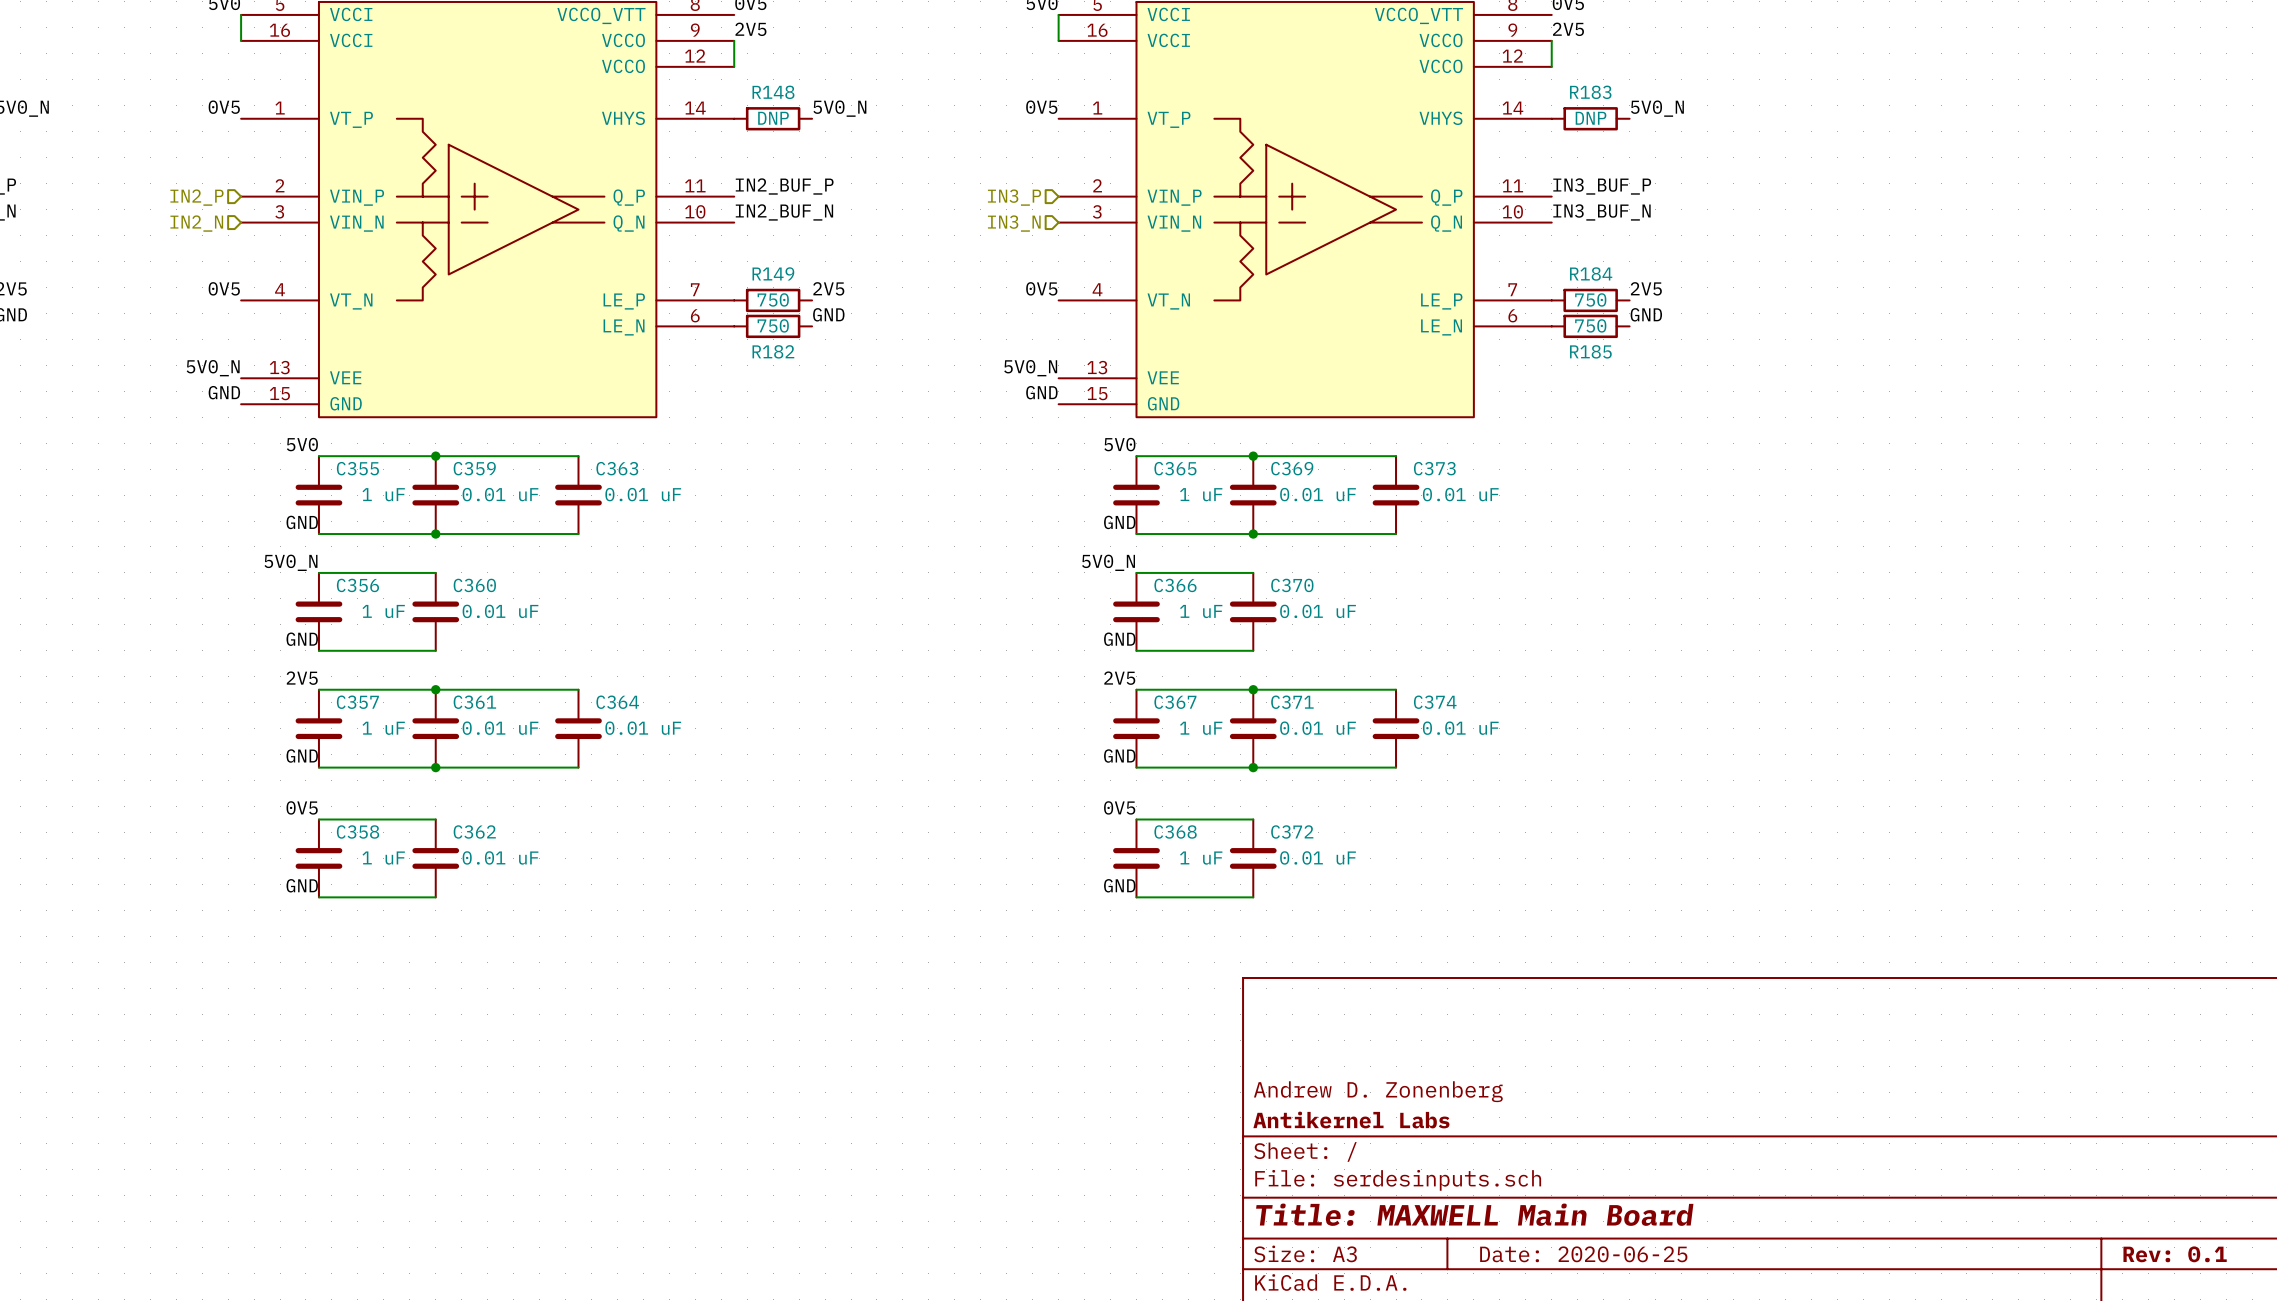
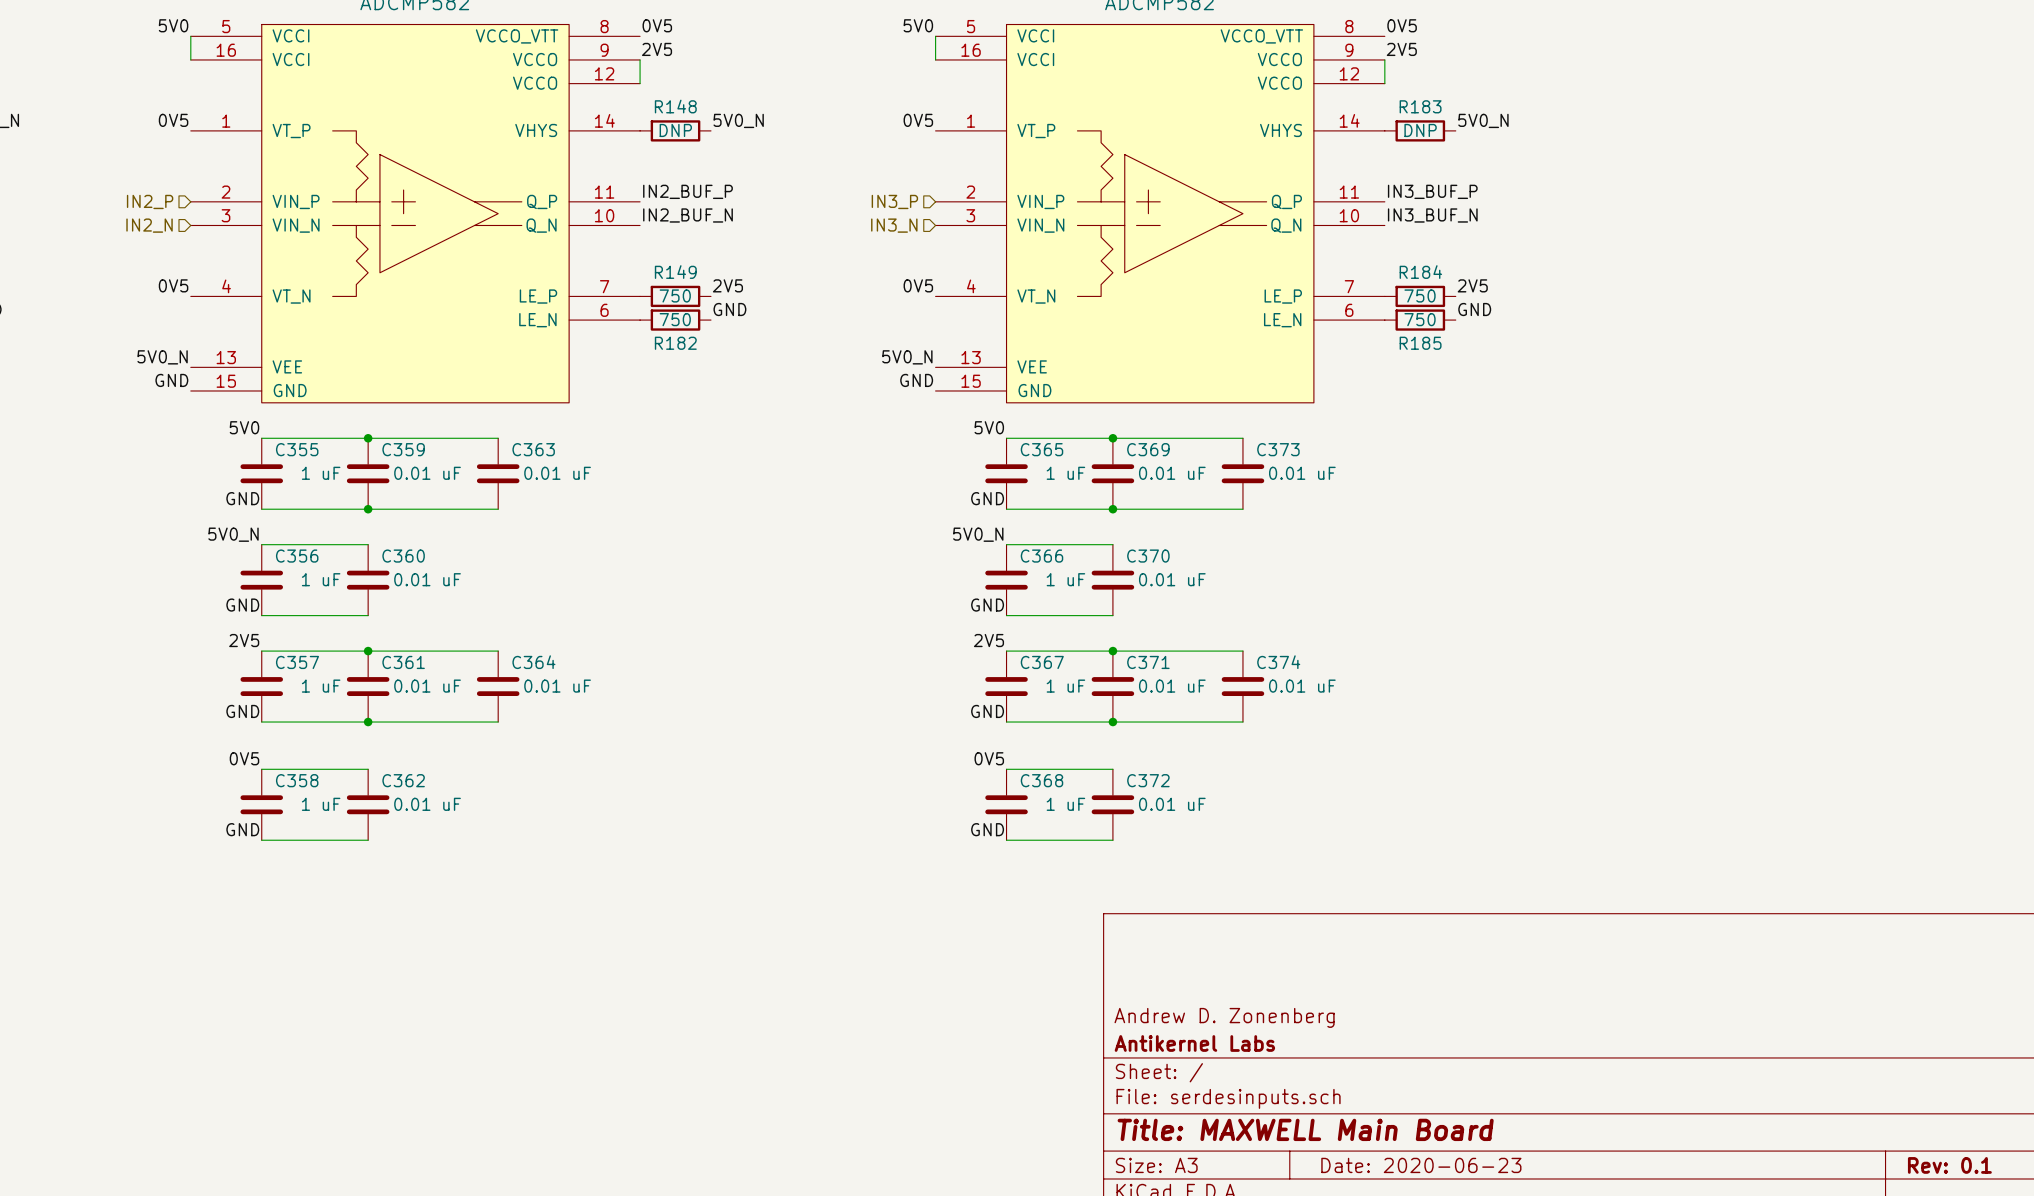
title block: Date: 2020-06-25 (1583, 1254) -> Date: 2020-06-23 (1421, 1165)

